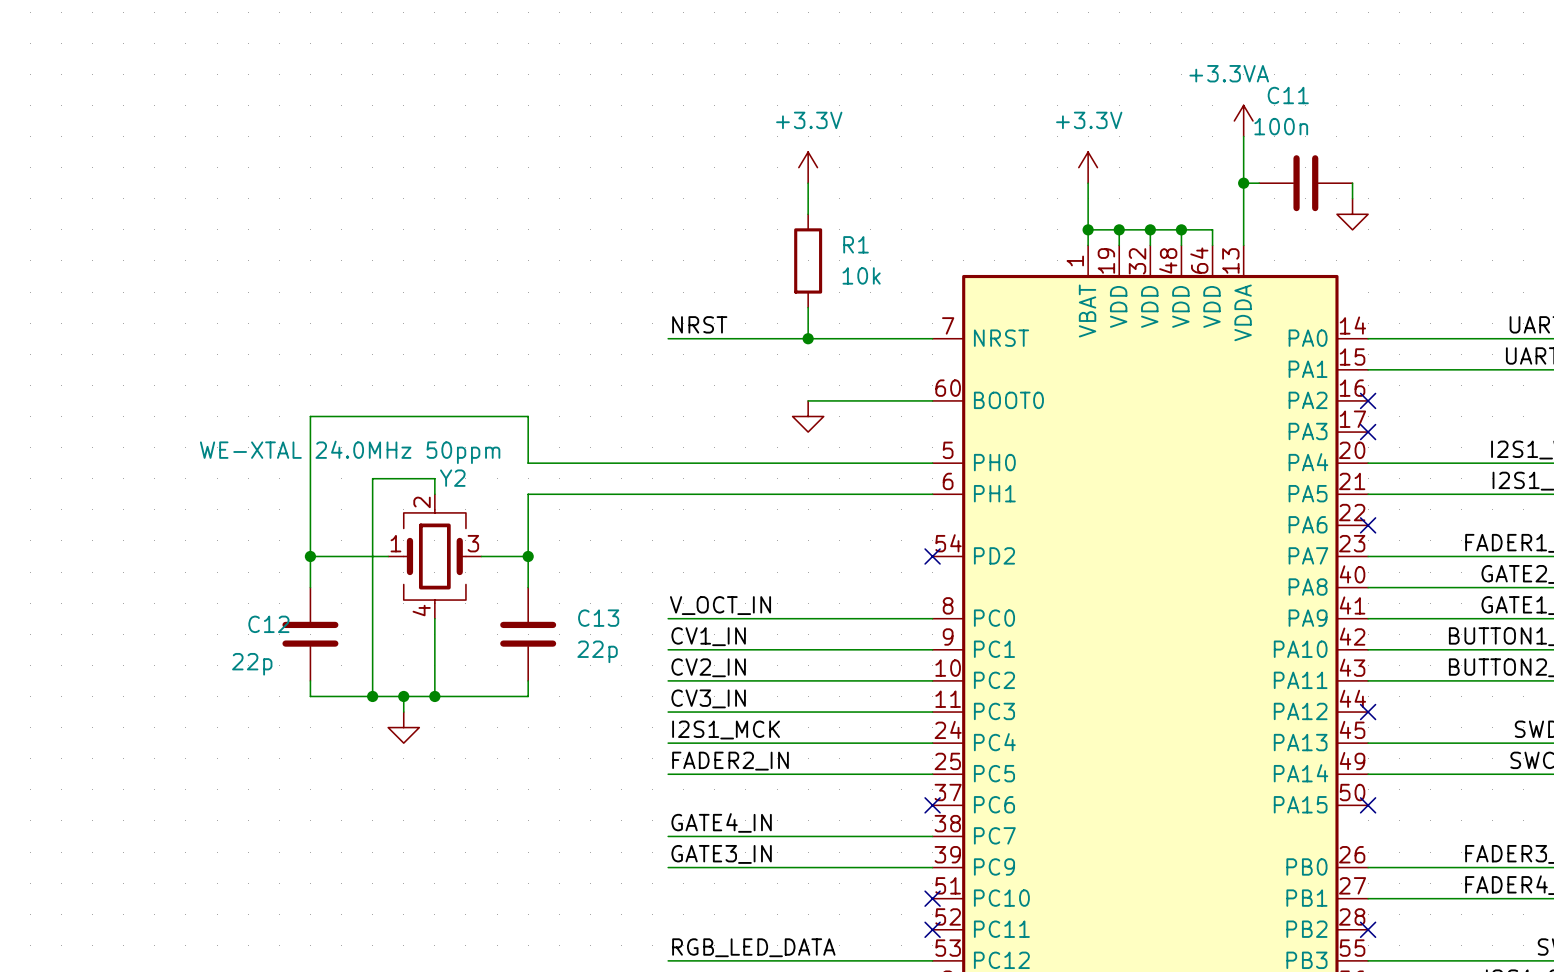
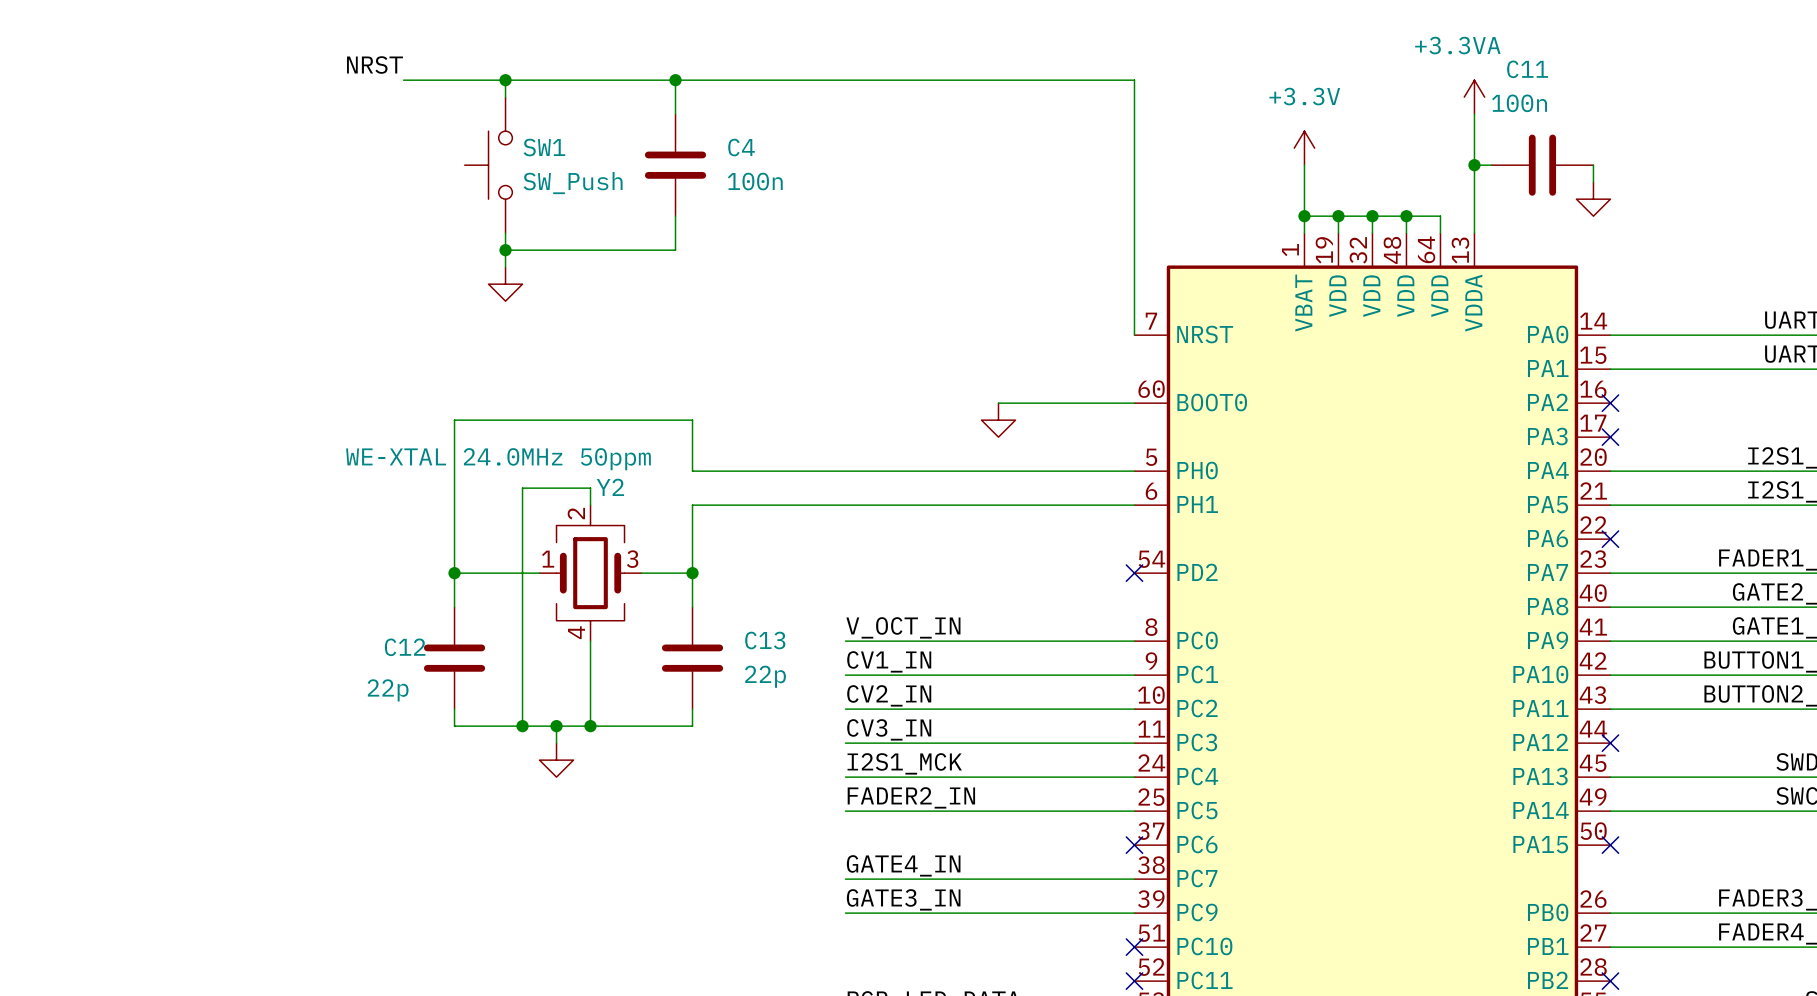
label: none -> NRST (374, 65)
wire: none -> (505, 80) (505, 97)
junction: none -> (505, 80)
junction: none -> (675, 80)
power symbol: +3.3V (808, 167) -> none
SW1: none -> SW_Push (488, 165)
C4: none -> 100n (675, 165)
wire: (808, 183) (808, 214) -> (675, 80) (675, 114)
wire: none -> (675, 216) (675, 250) (505, 250)
wire: none -> (505, 233) (505, 267)
junction: none -> (505, 250)
R1: 10k (808, 260) -> none
power symbol: none -> (505, 284)
wire: (808, 307) (808, 338) -> none
label: NRST (699, 324) -> none
wire: (668, 338) (932, 338) -> (403, 80) (1134, 80) (1134, 335)
junction: (808, 338) -> none

